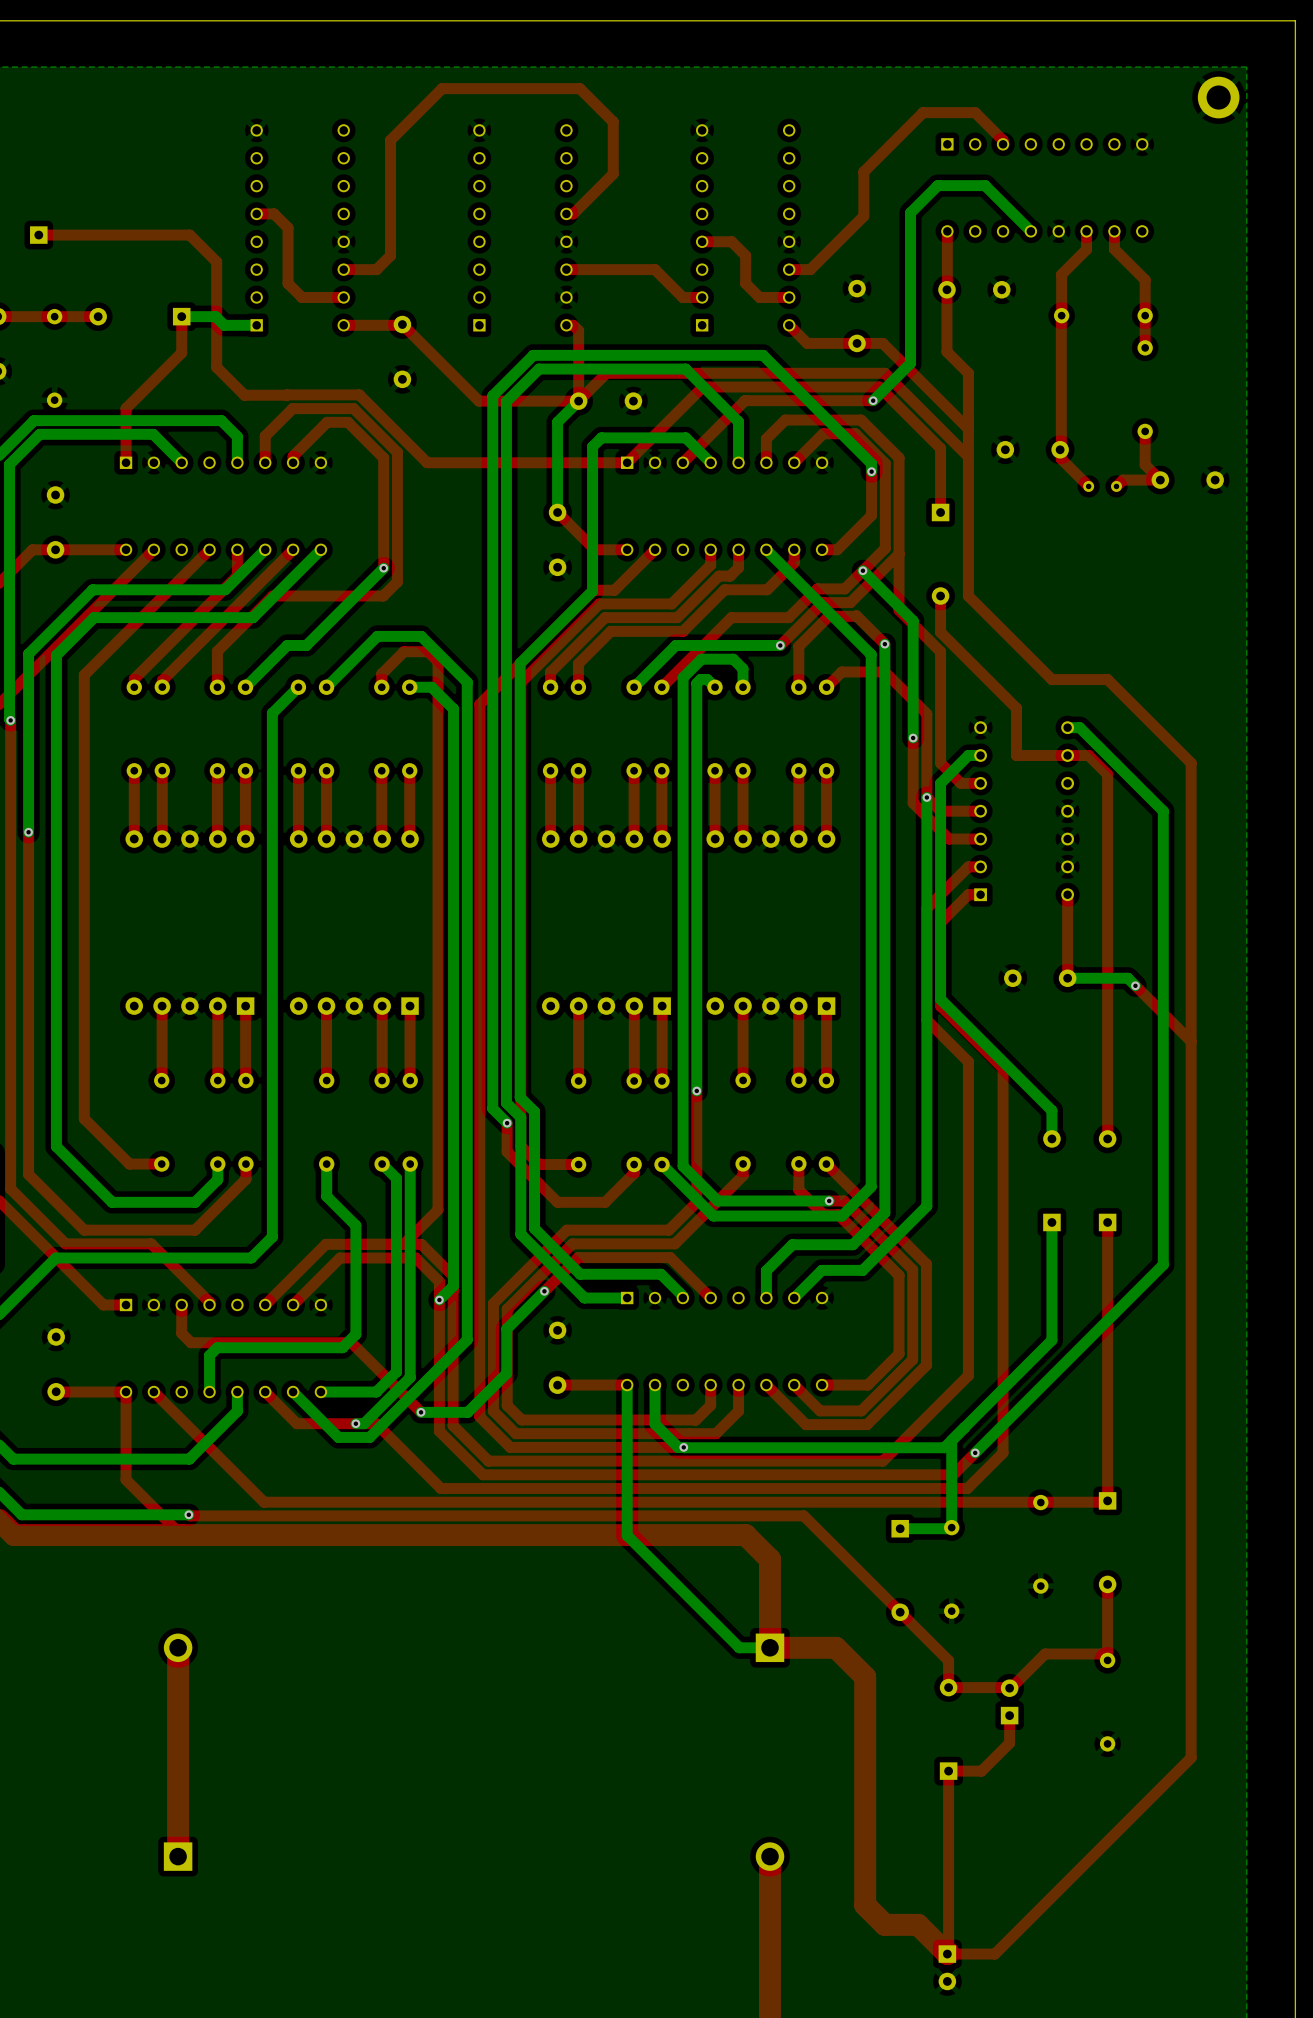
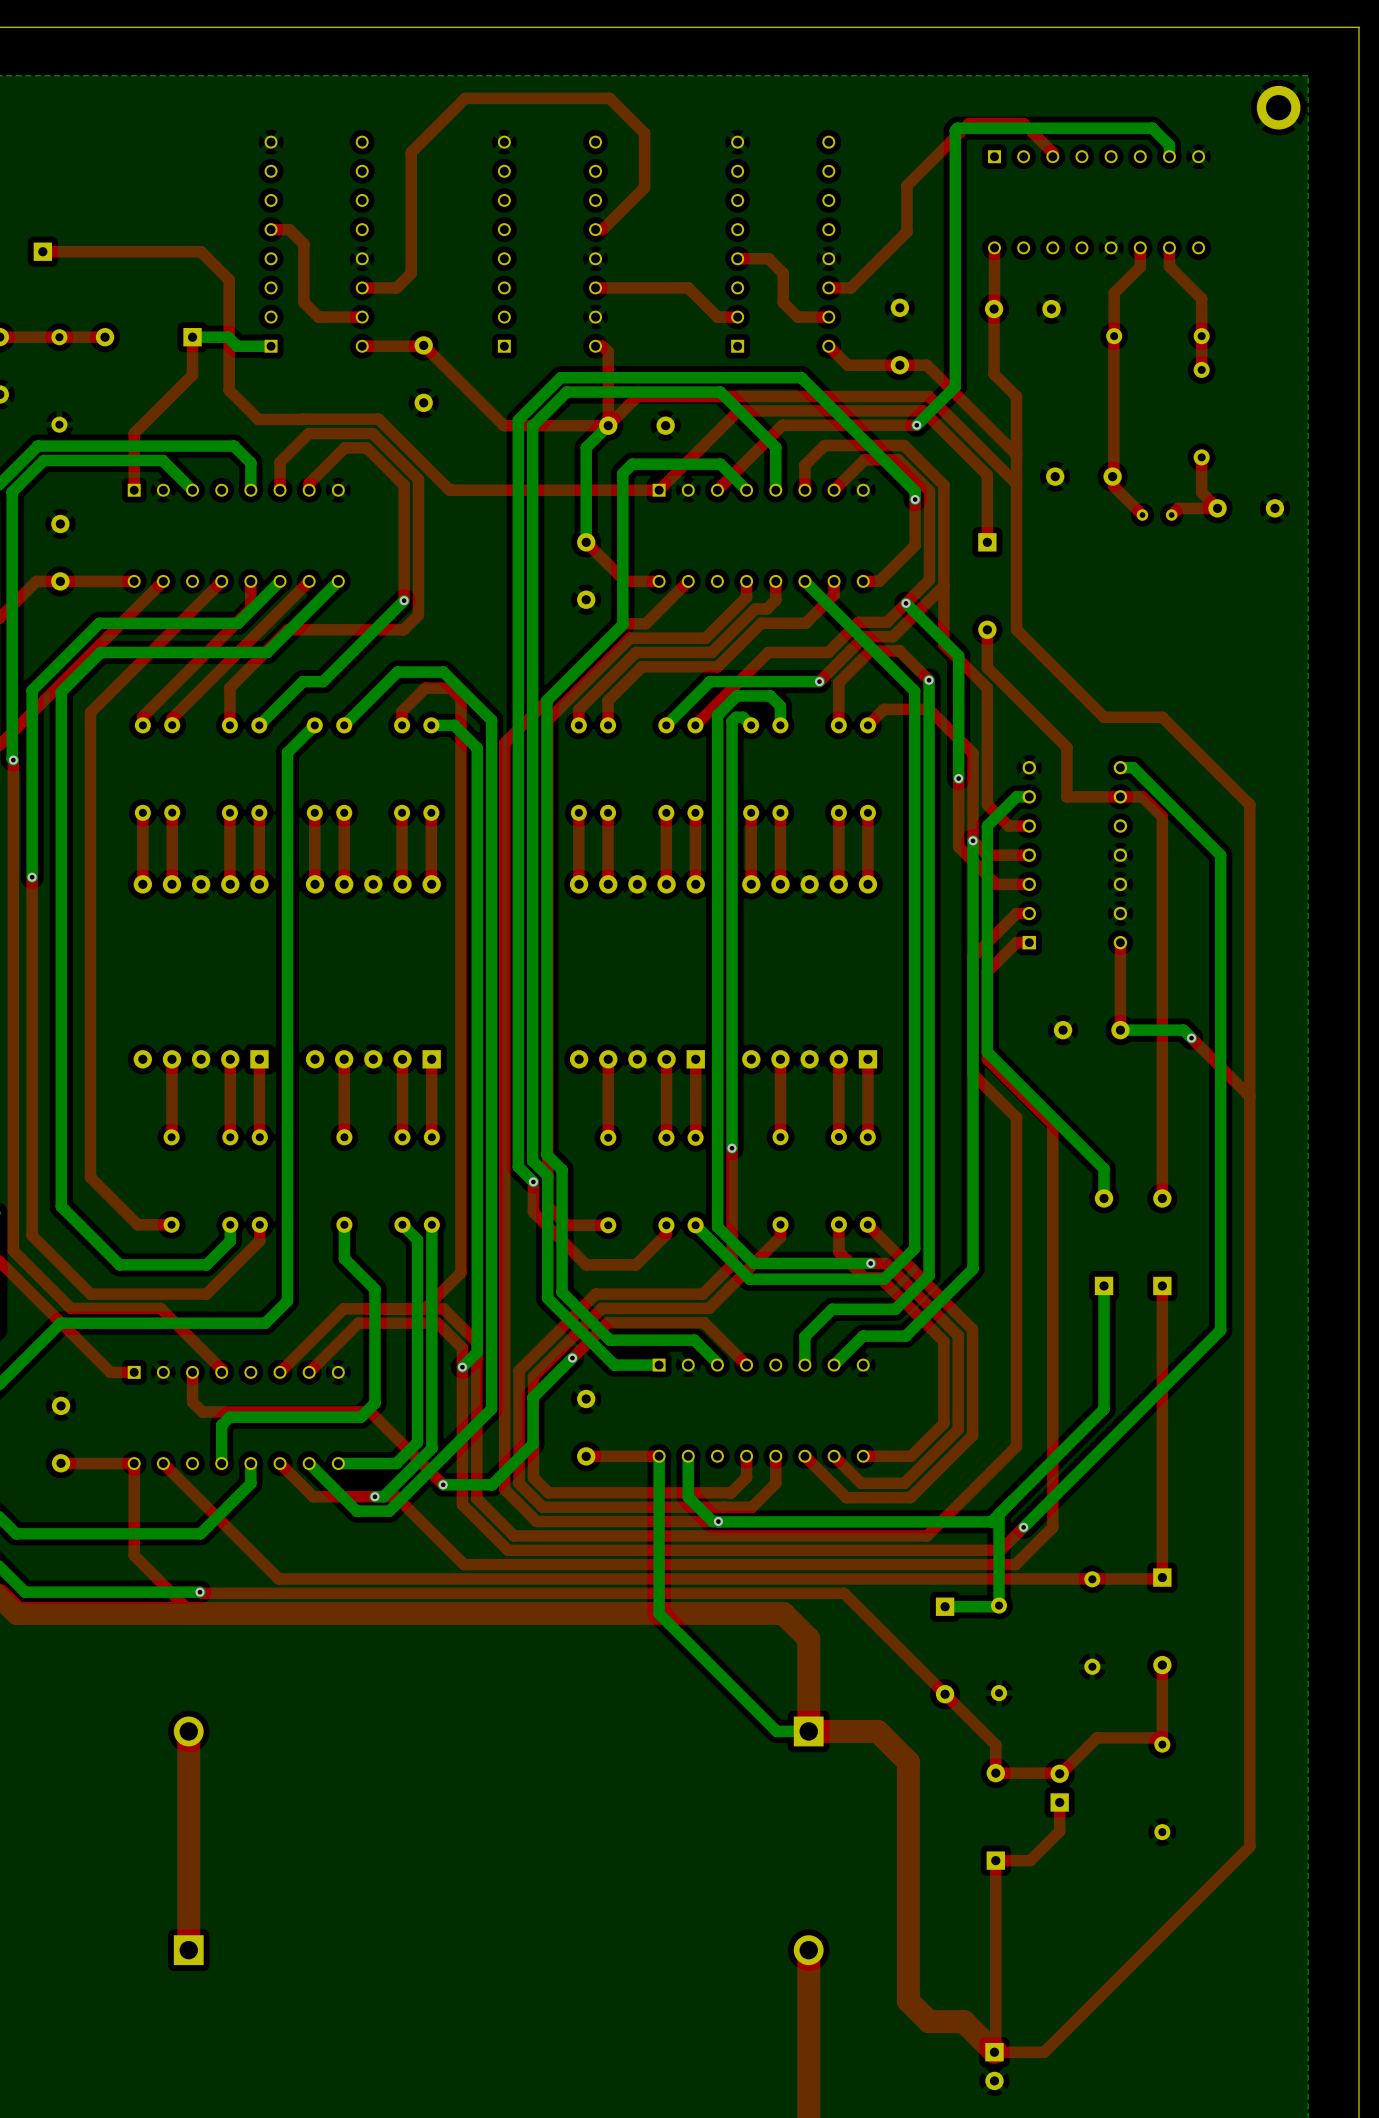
bottom track: (1030, 231) (985, 185) (937, 185) (910, 212) (909, 363) -> (1169, 156) (1169, 145) (1152, 128) (957, 128) (955, 130) (955, 386)

